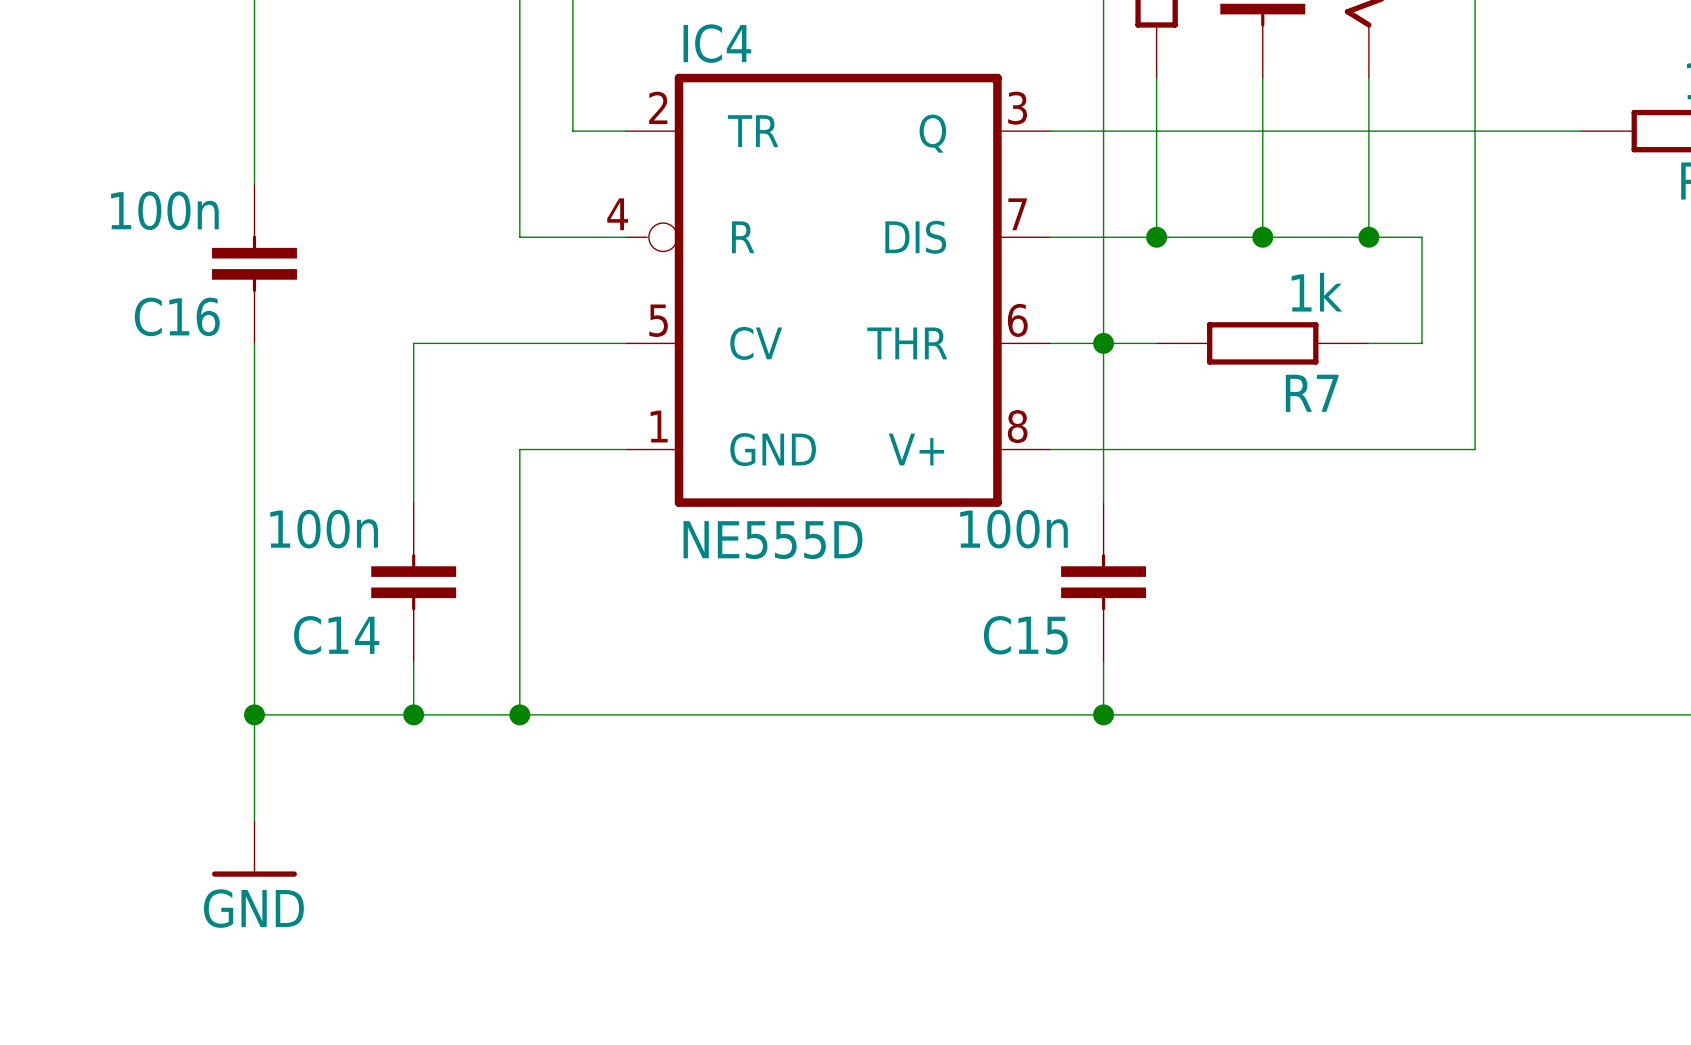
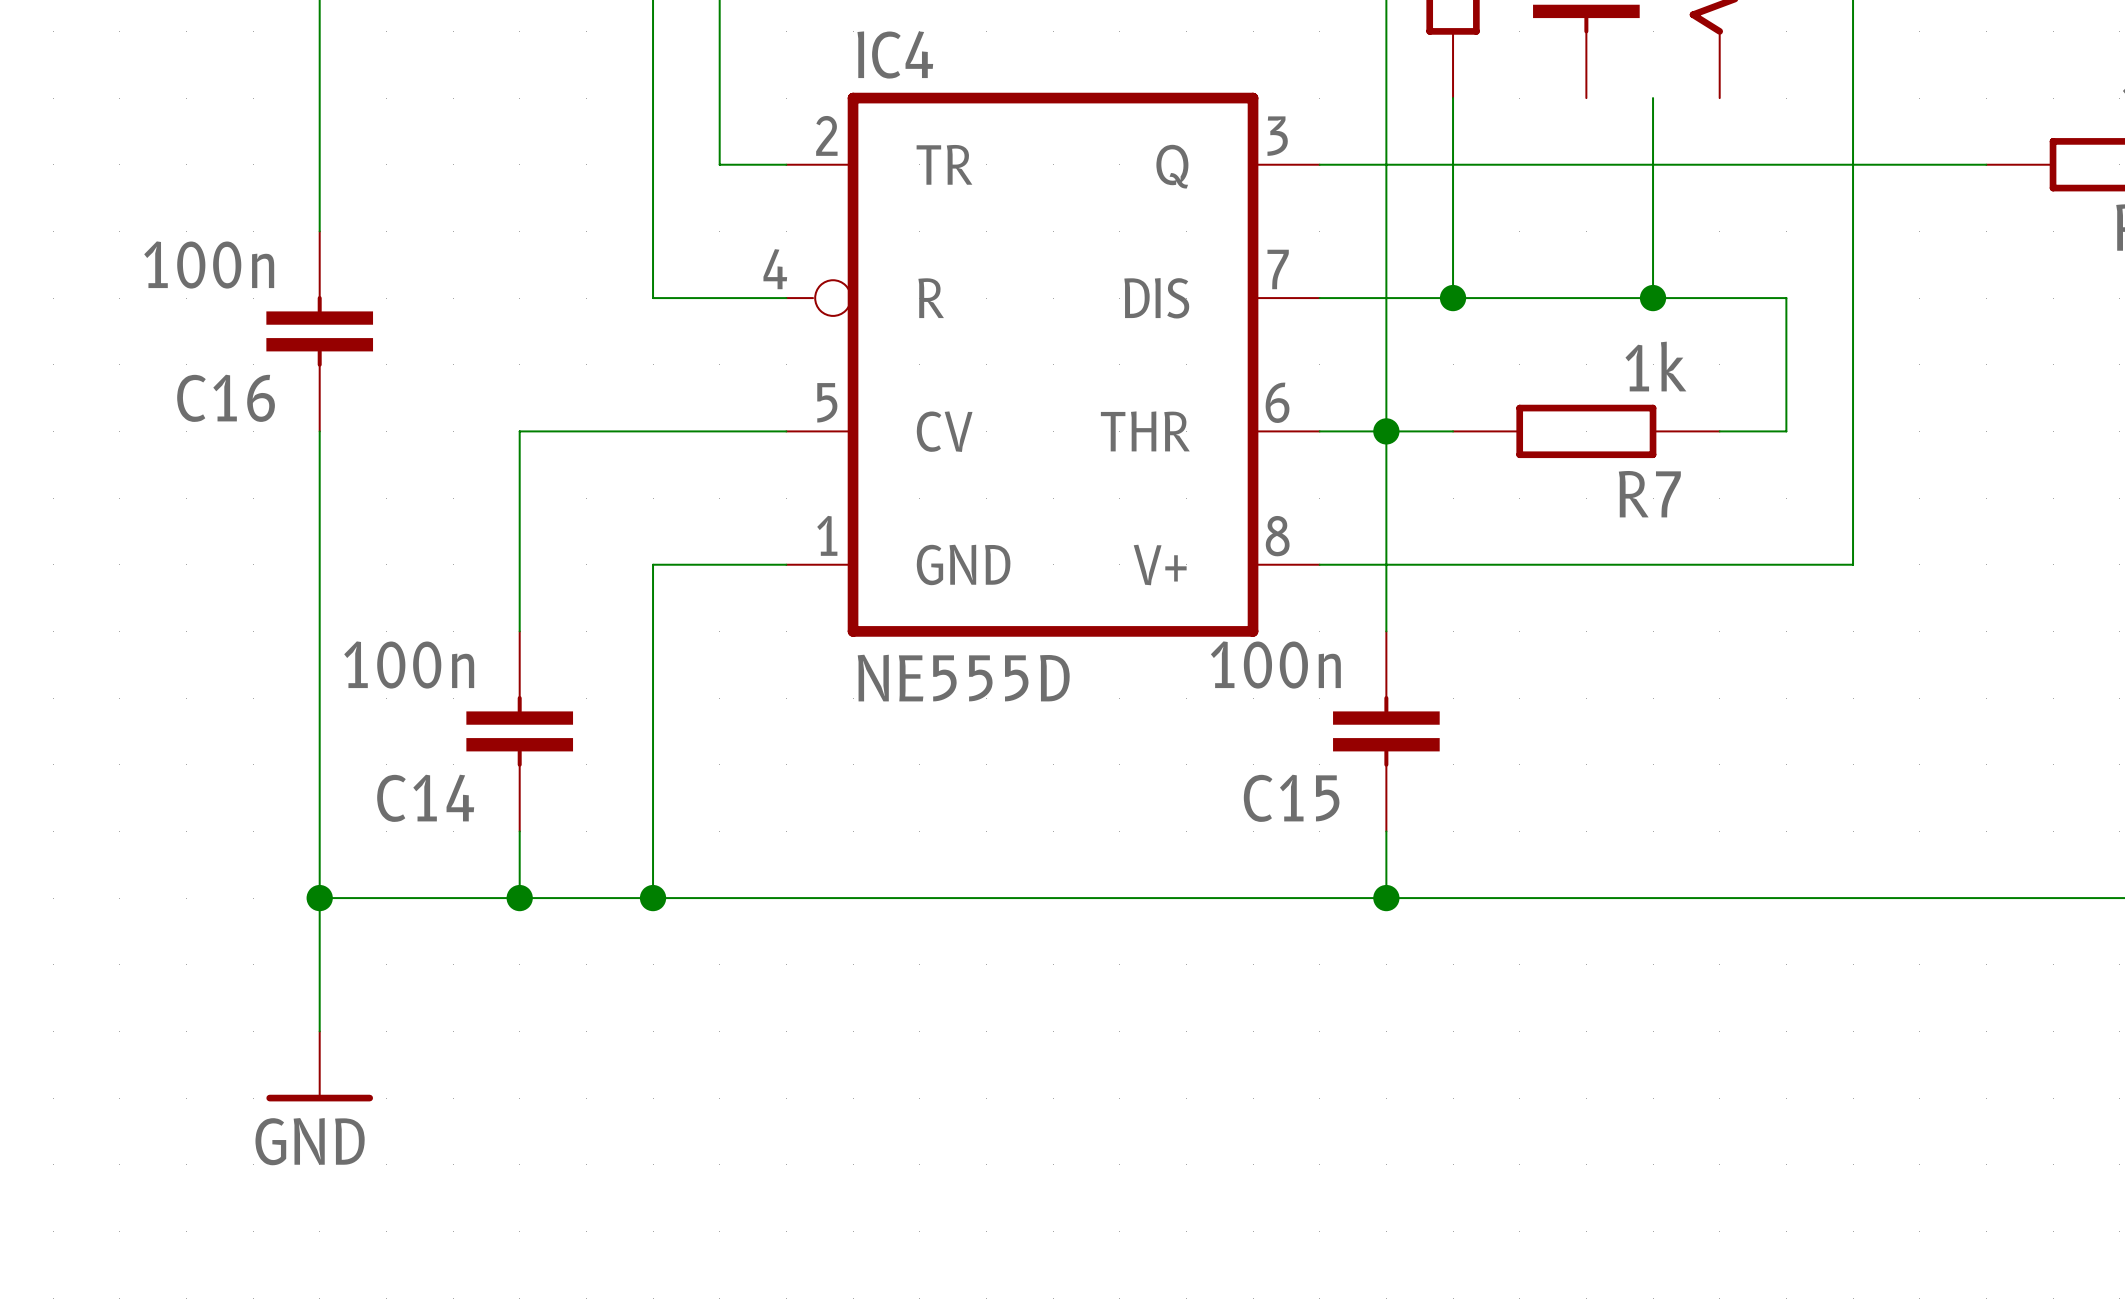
wire: (1262, 78) (1262, 237) -> none
wire: (1368, 78) (1368, 237) -> (1653, 98) (1653, 298)
junction: (1262, 237) -> none
junction: none -> (1653, 298)
junction: (1368, 237) -> none

